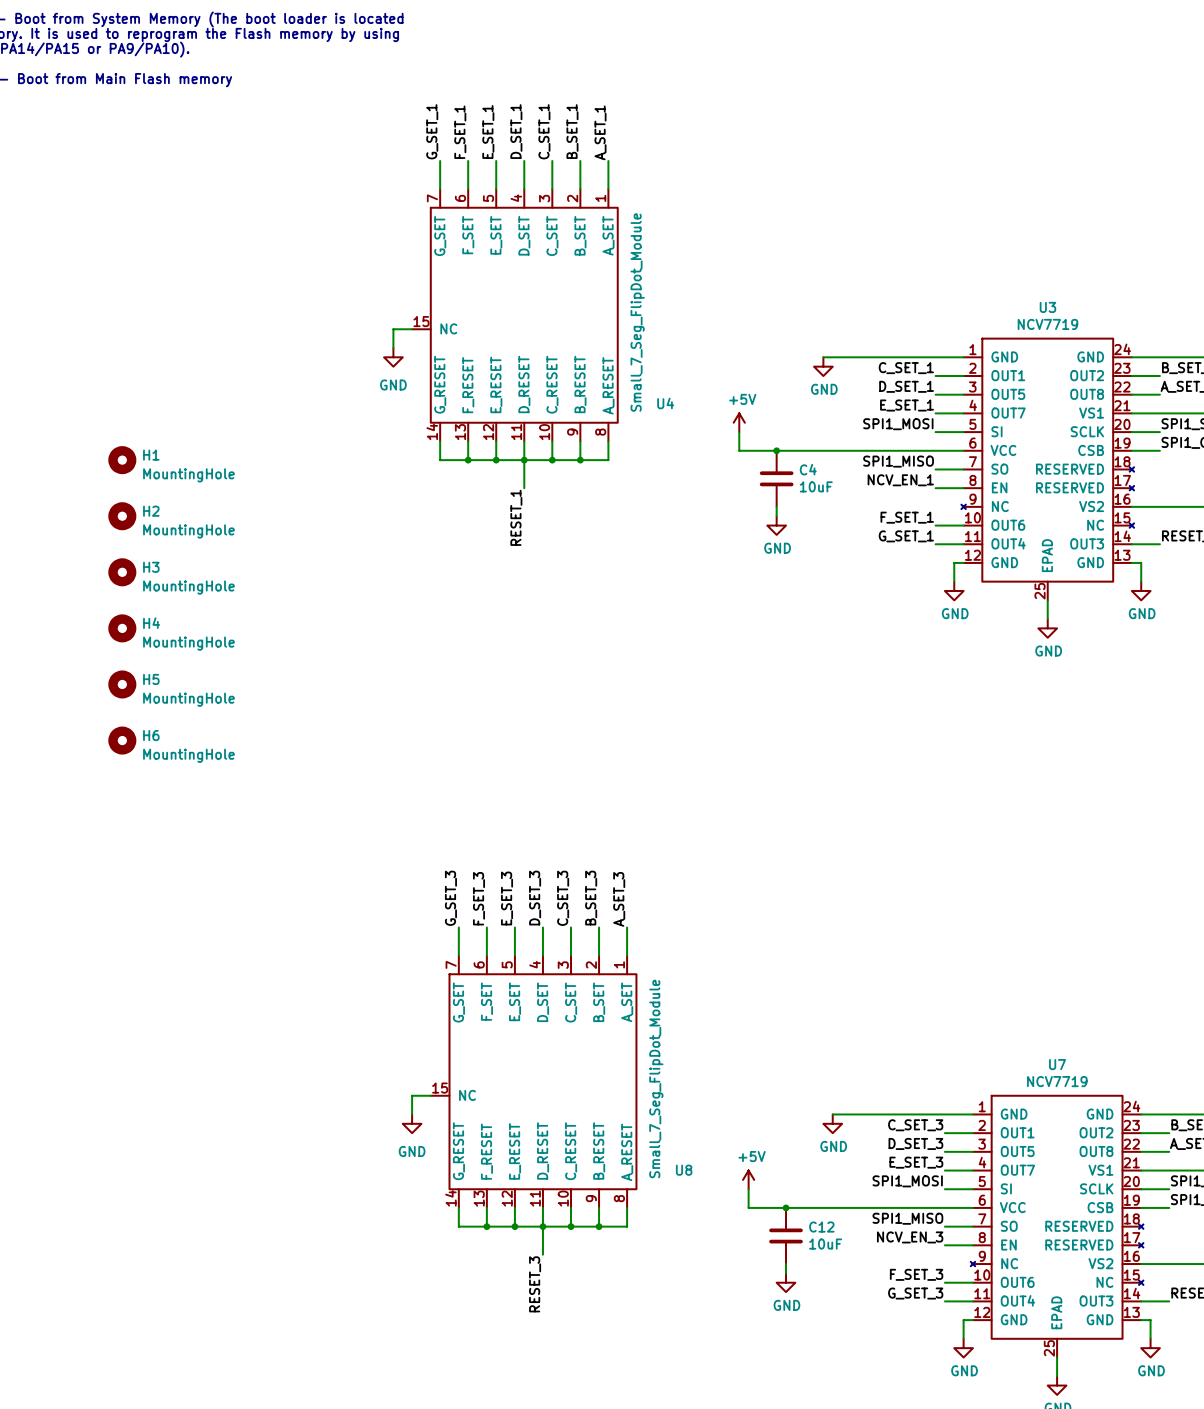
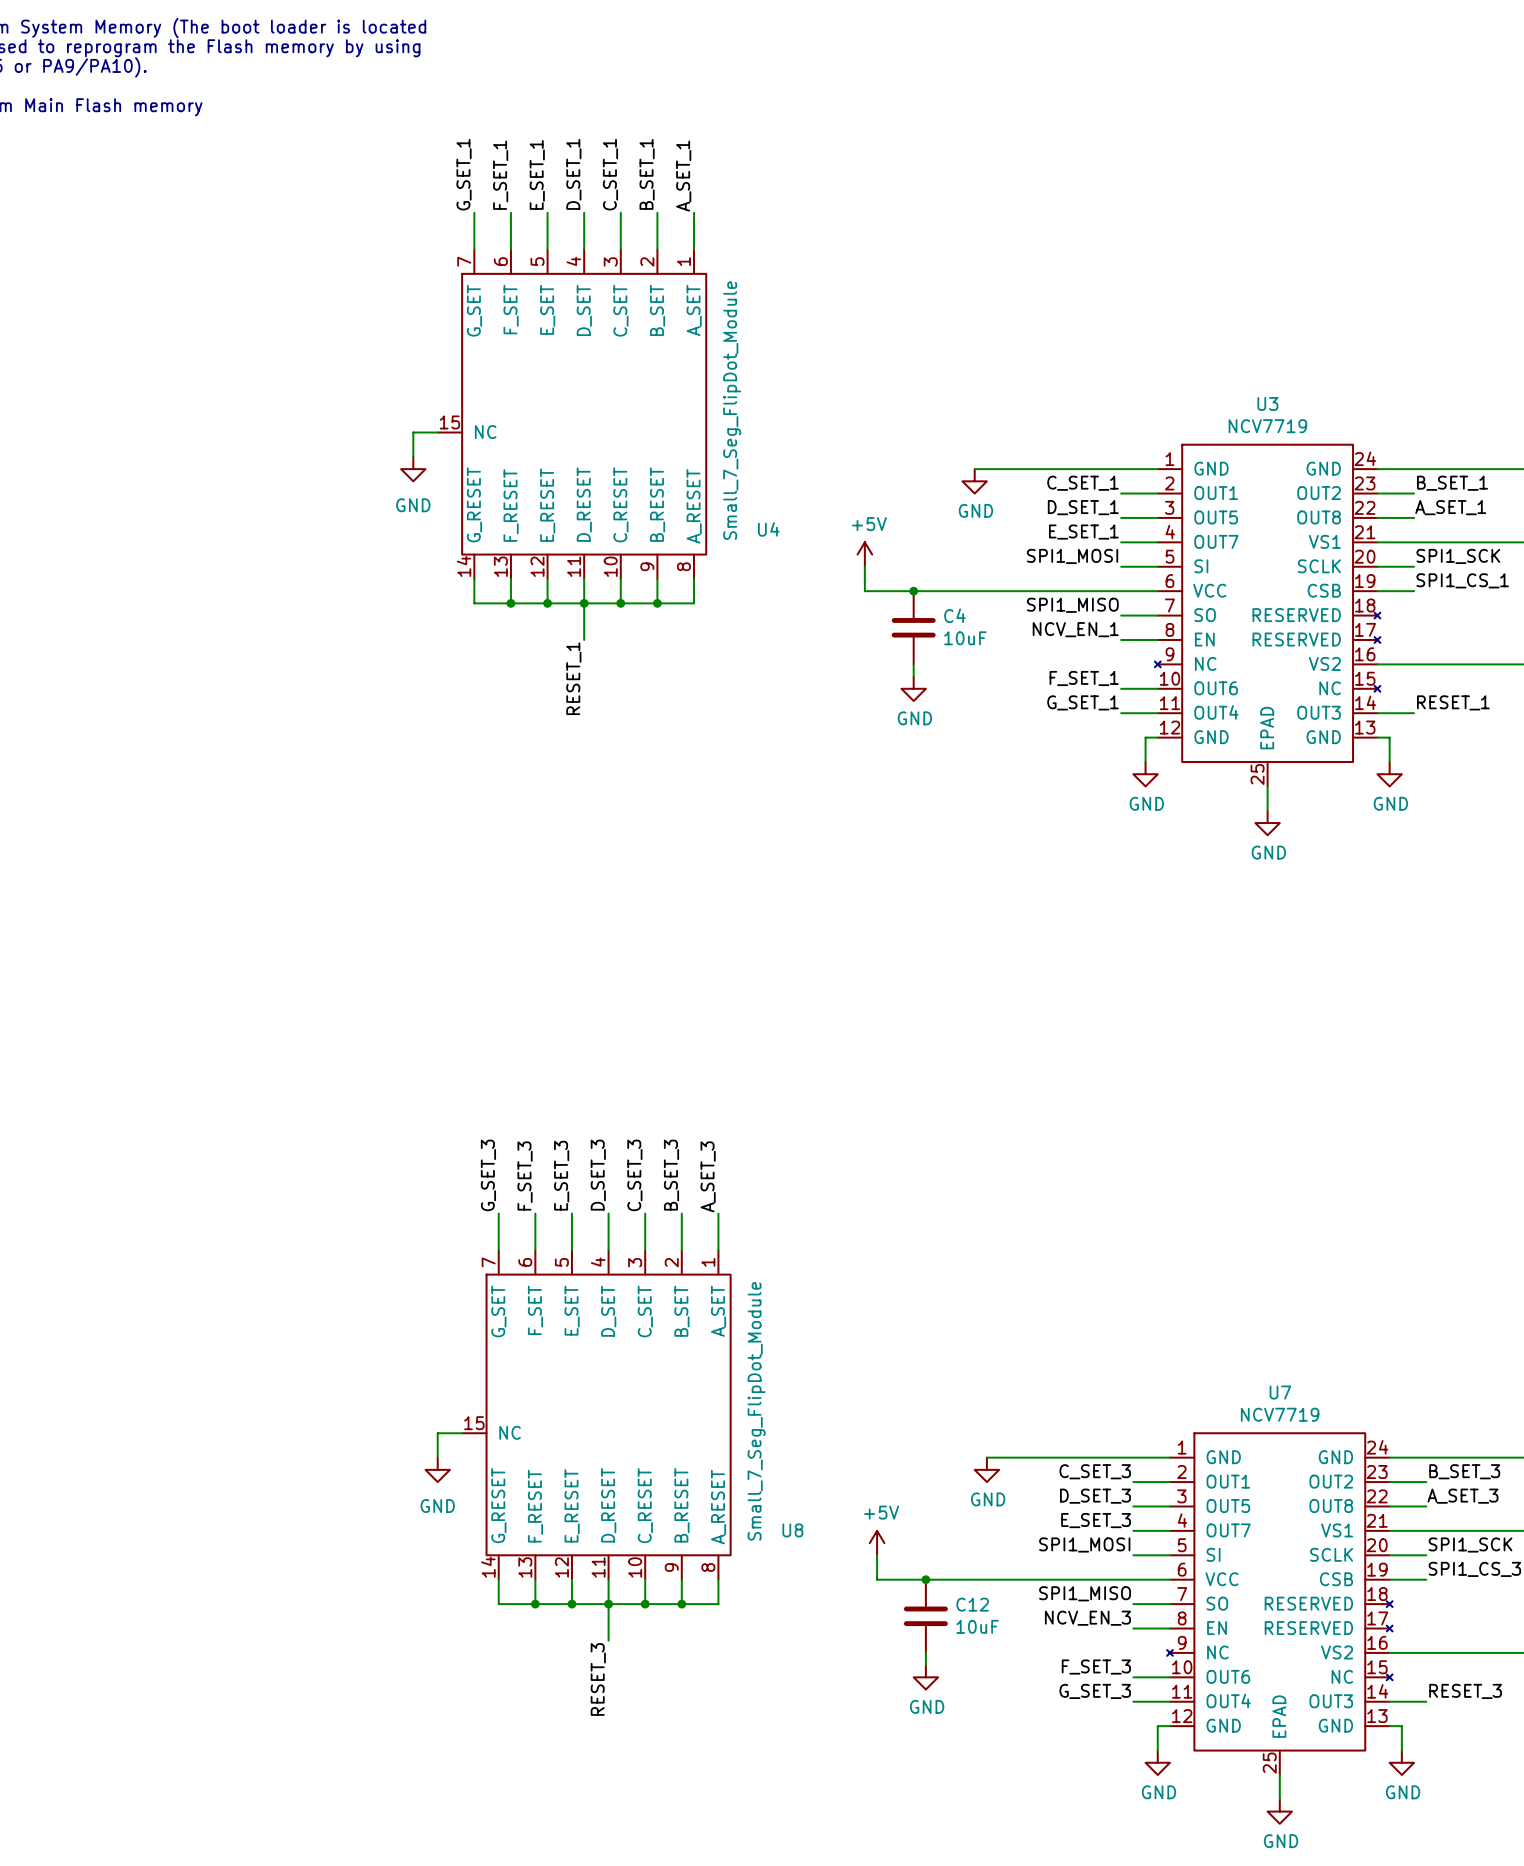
H1: MountingHole (122, 460) -> none
H2: MountingHole (122, 516) -> none
H3: MountingHole (122, 572) -> none
H4: MountingHole (122, 628) -> none
H5: MountingHole (122, 684) -> none
H6: MountingHole (122, 740) -> none

